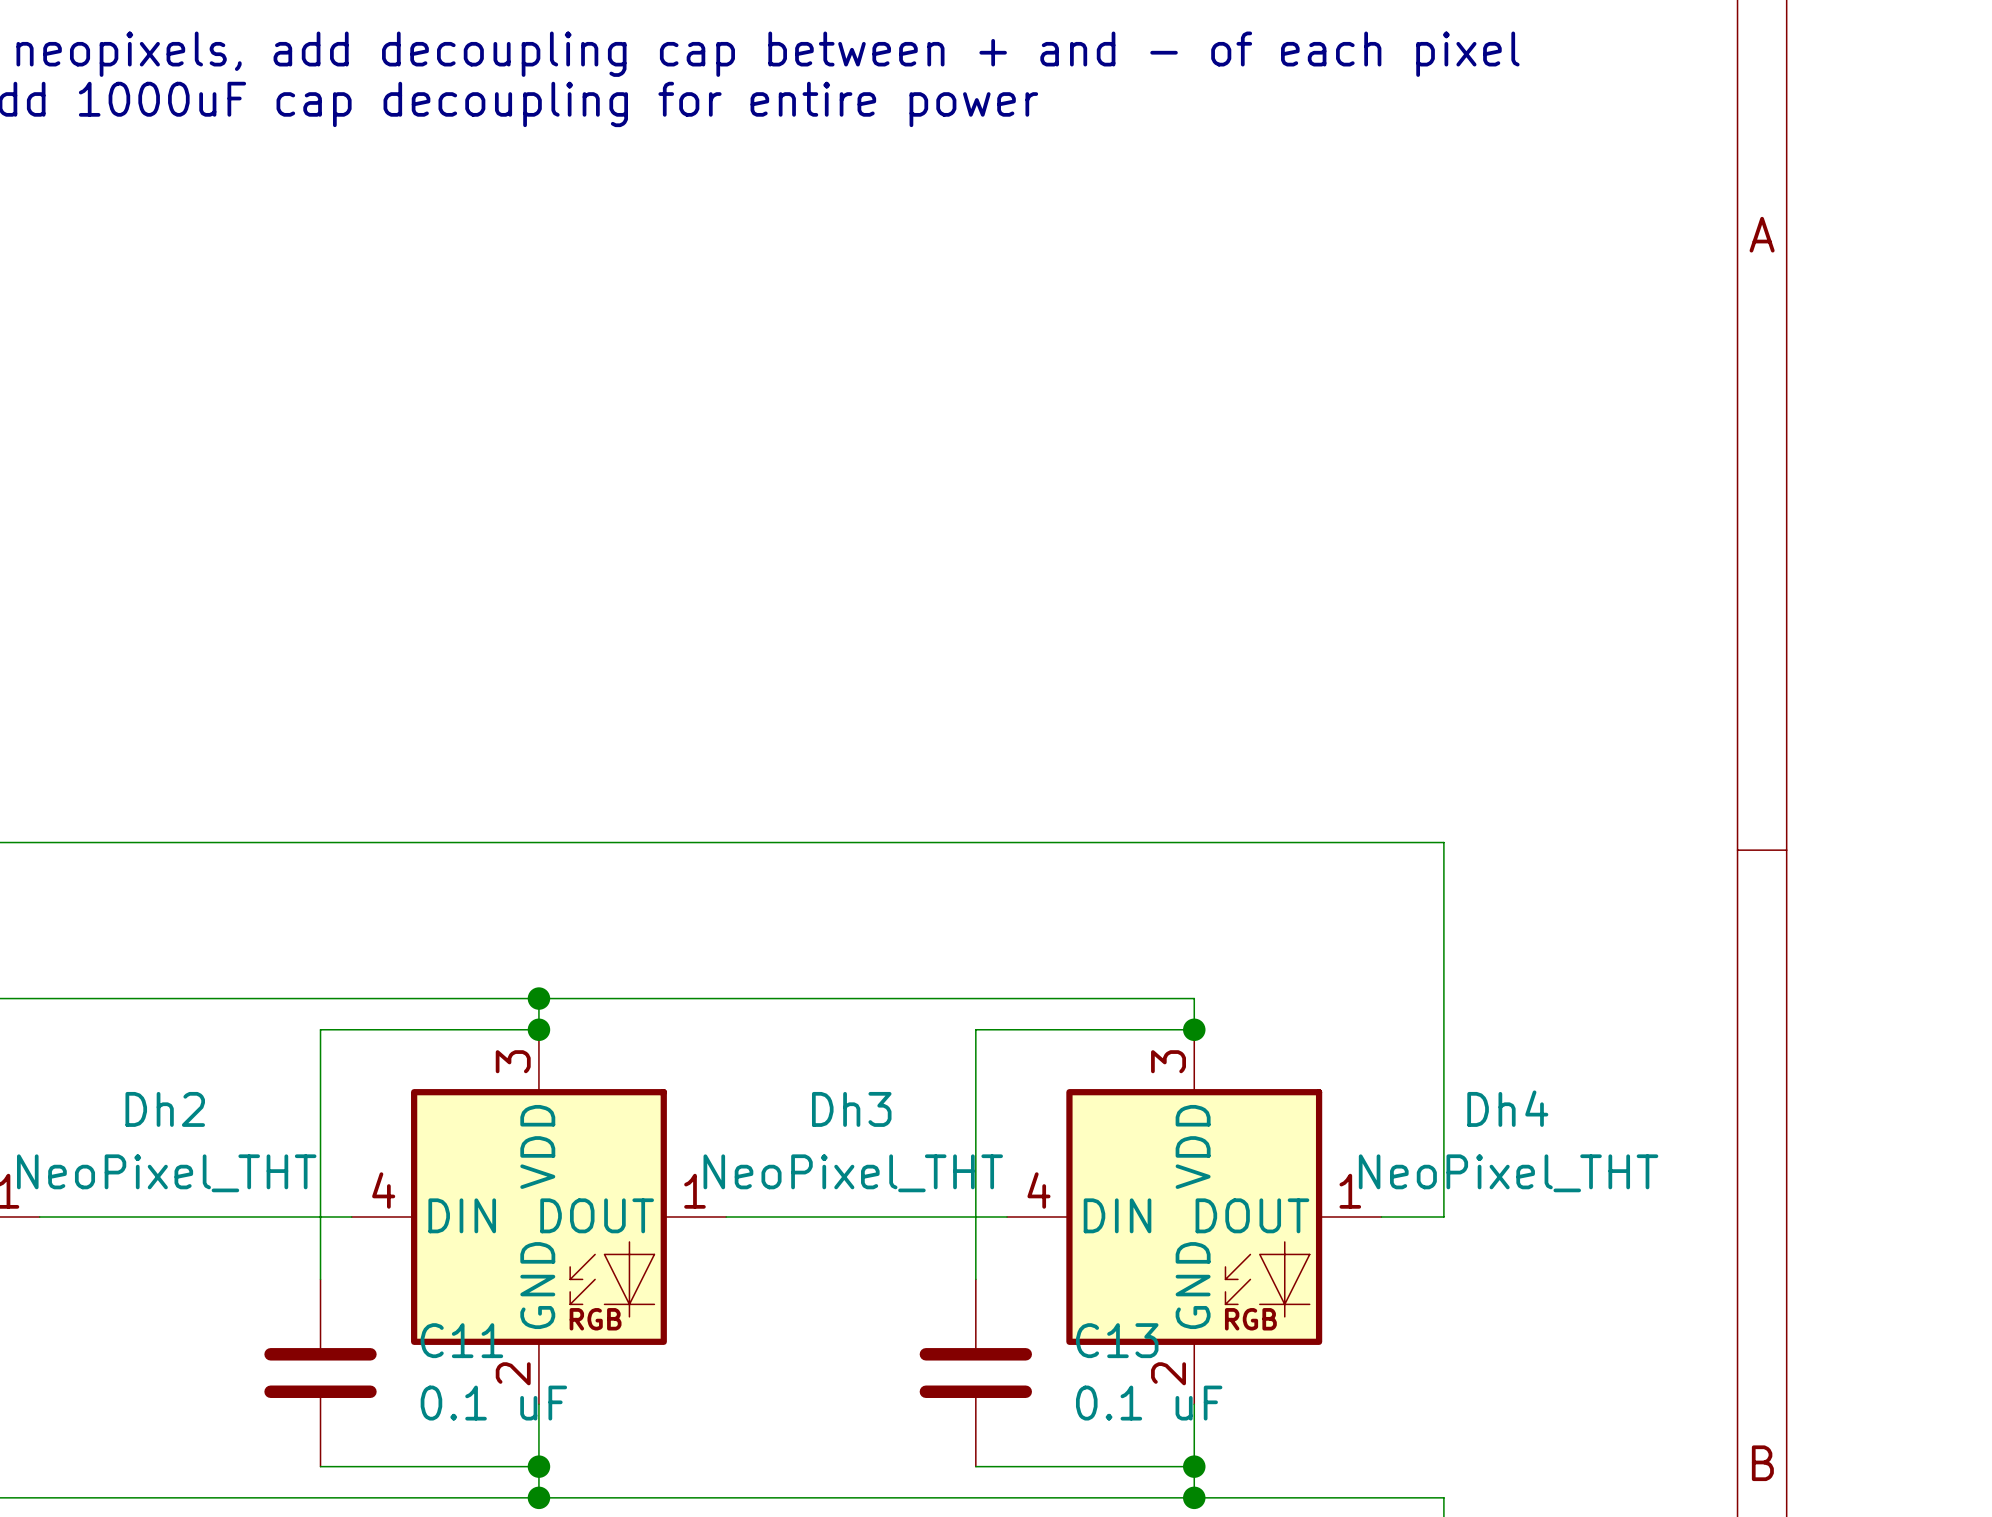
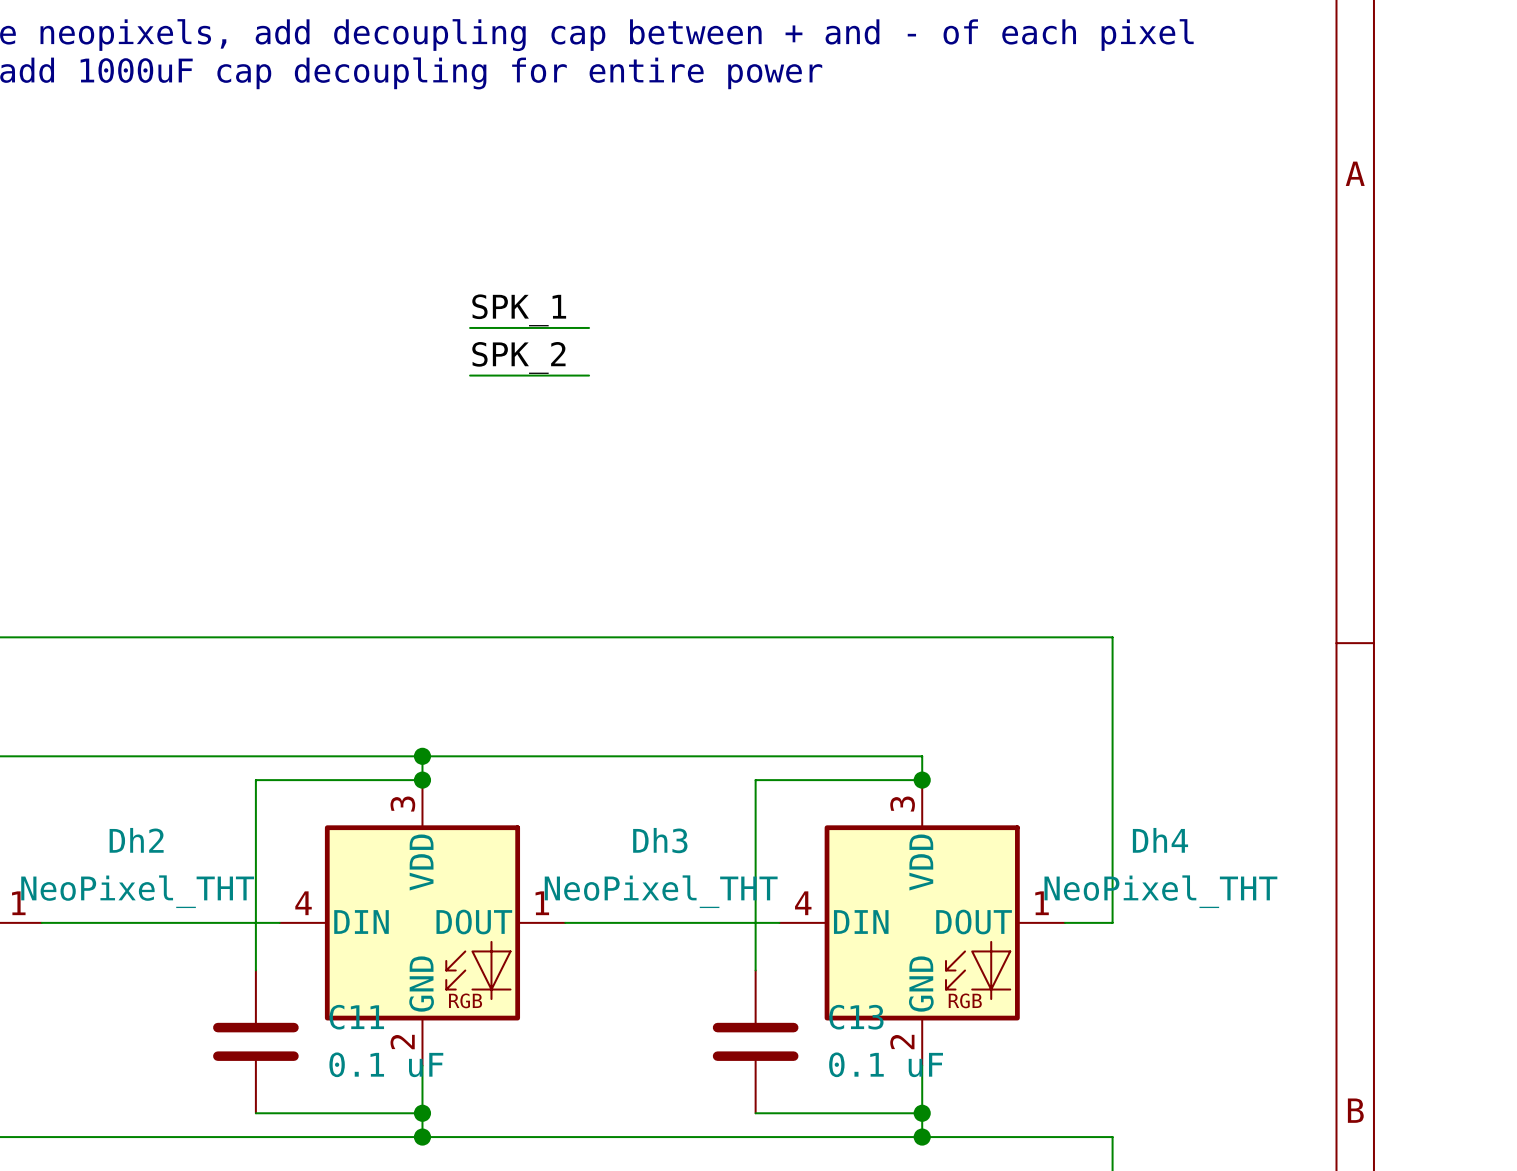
label: none -> SPK_1 (519, 310)
wire: none -> (470, 327) (589, 327)
label: none -> SPK_2 (518, 357)
wire: none -> (470, 375) (589, 375)

